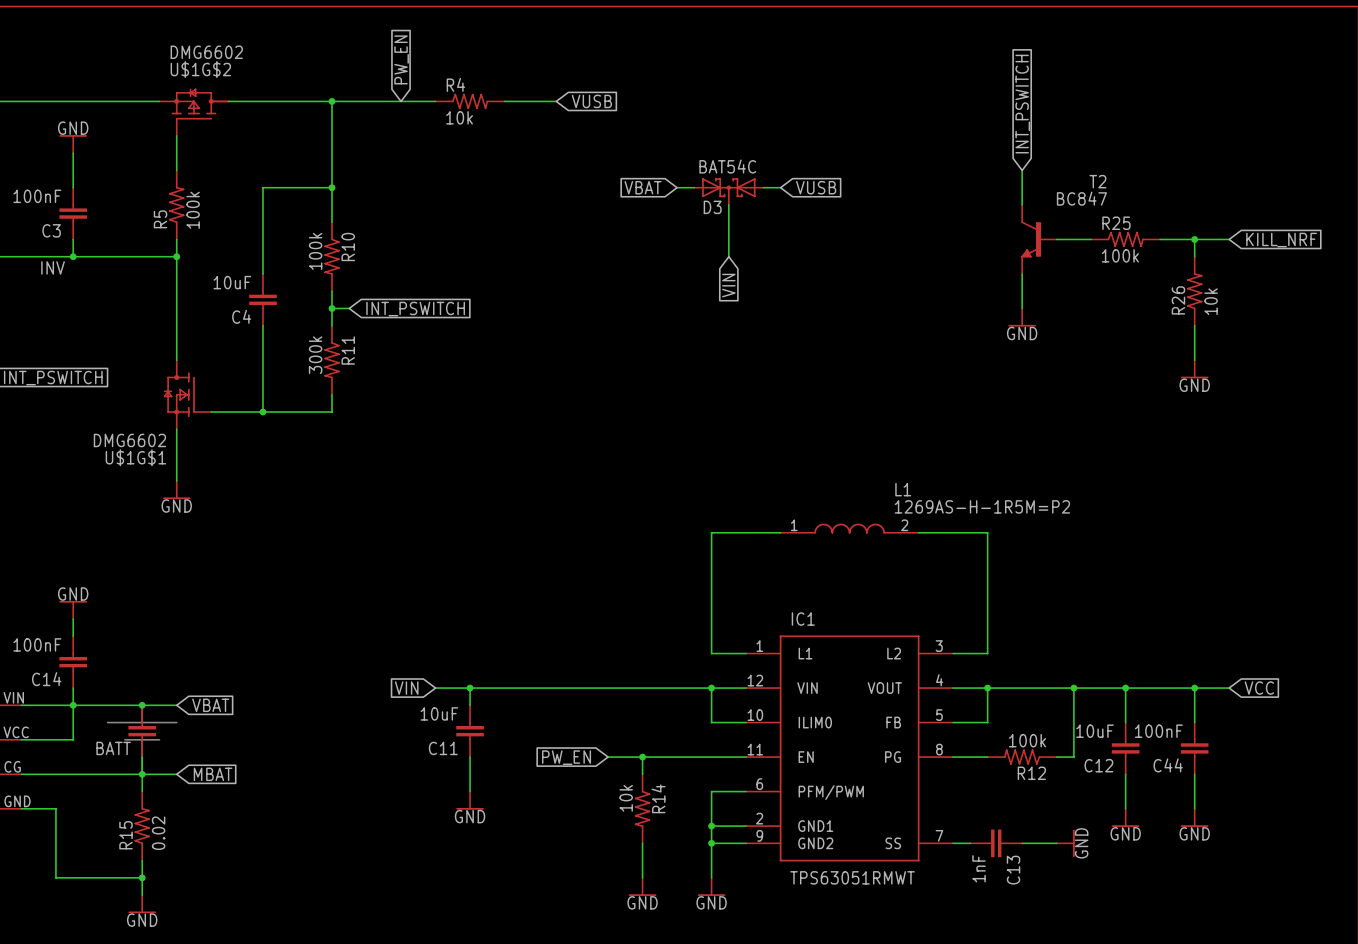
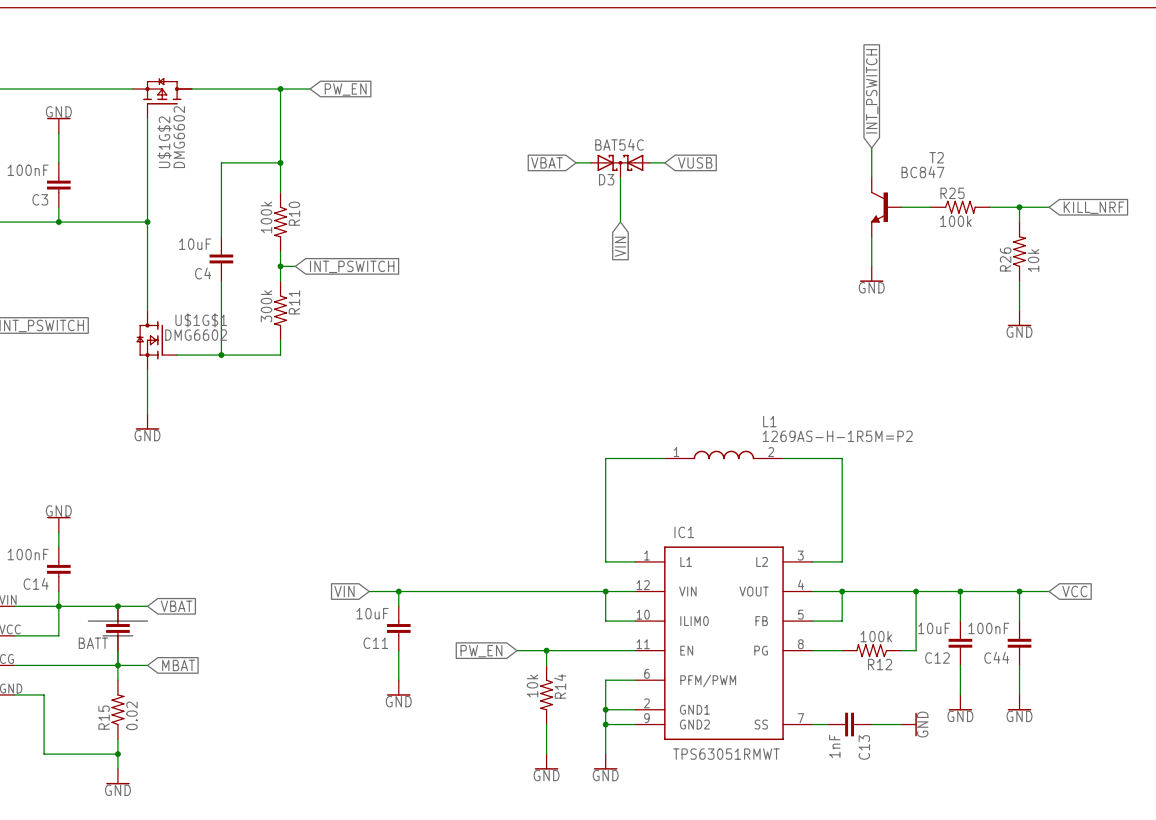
U$1G$2 value rotation: 0° (206, 52) -> 90° counterclockwise (179, 137)
U$1G$2 value position: DMG6602 (206, 52) -> DMG6602 (179, 137)
global label rotation: 0° (401, 59) -> 90° clockwise (345, 89)
U$1G$2 name rotation: 0° (200, 69) -> 90° counterclockwise (164, 142)
U$1G$2 name position: U$1G$2 (200, 69) -> U$1G$2 (164, 142)
wire: (366, 101) (435, 101) -> none
R4: 10k (470, 101) -> none
wire: (504, 101) (556, 101) -> none
global label: VUSB (591, 101) -> none
R5: 100k (176, 204) -> none
label: INV (53, 267) -> none
U$1G$1 value position: DMG6602 (129, 440) -> DMG6602 (196, 335)
U$1G$1 name position: U$1G$1 (135, 457) -> U$1G$1 (201, 320)

